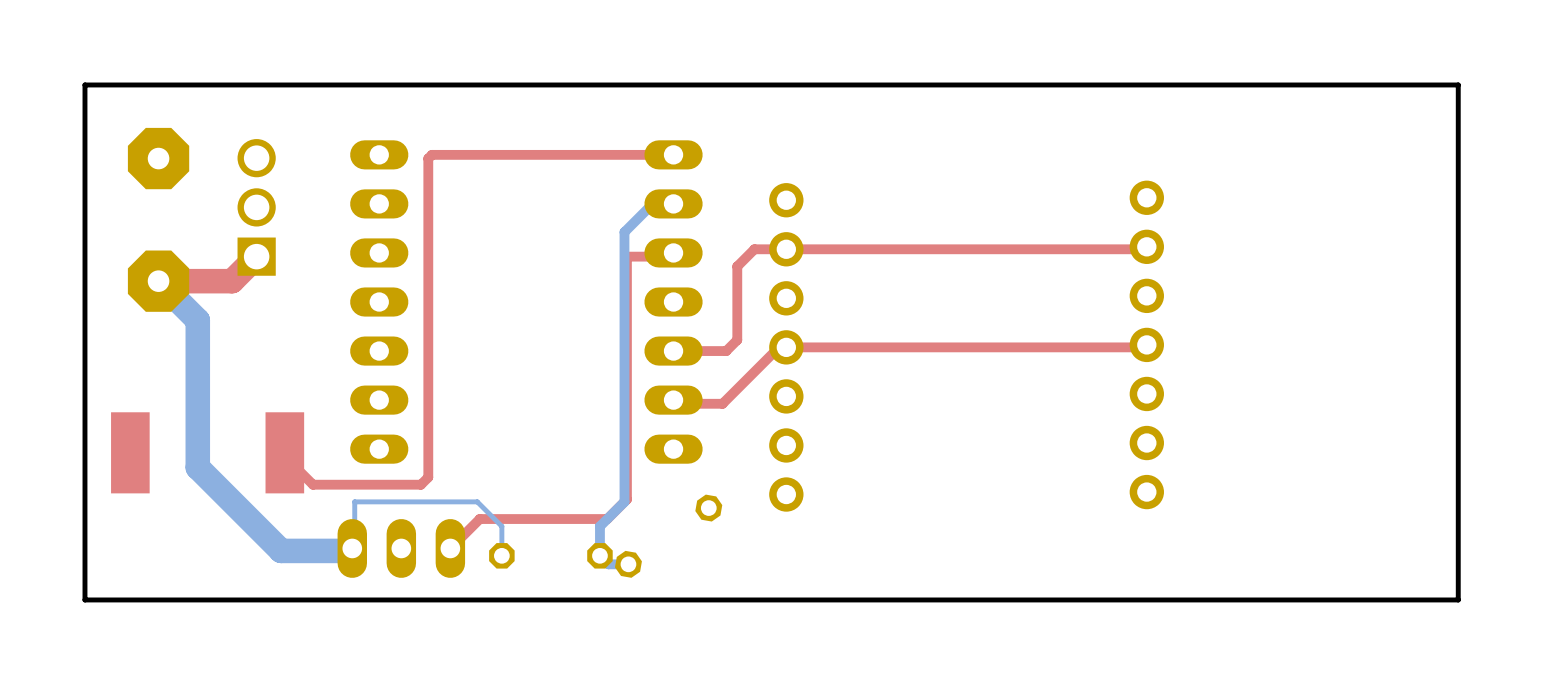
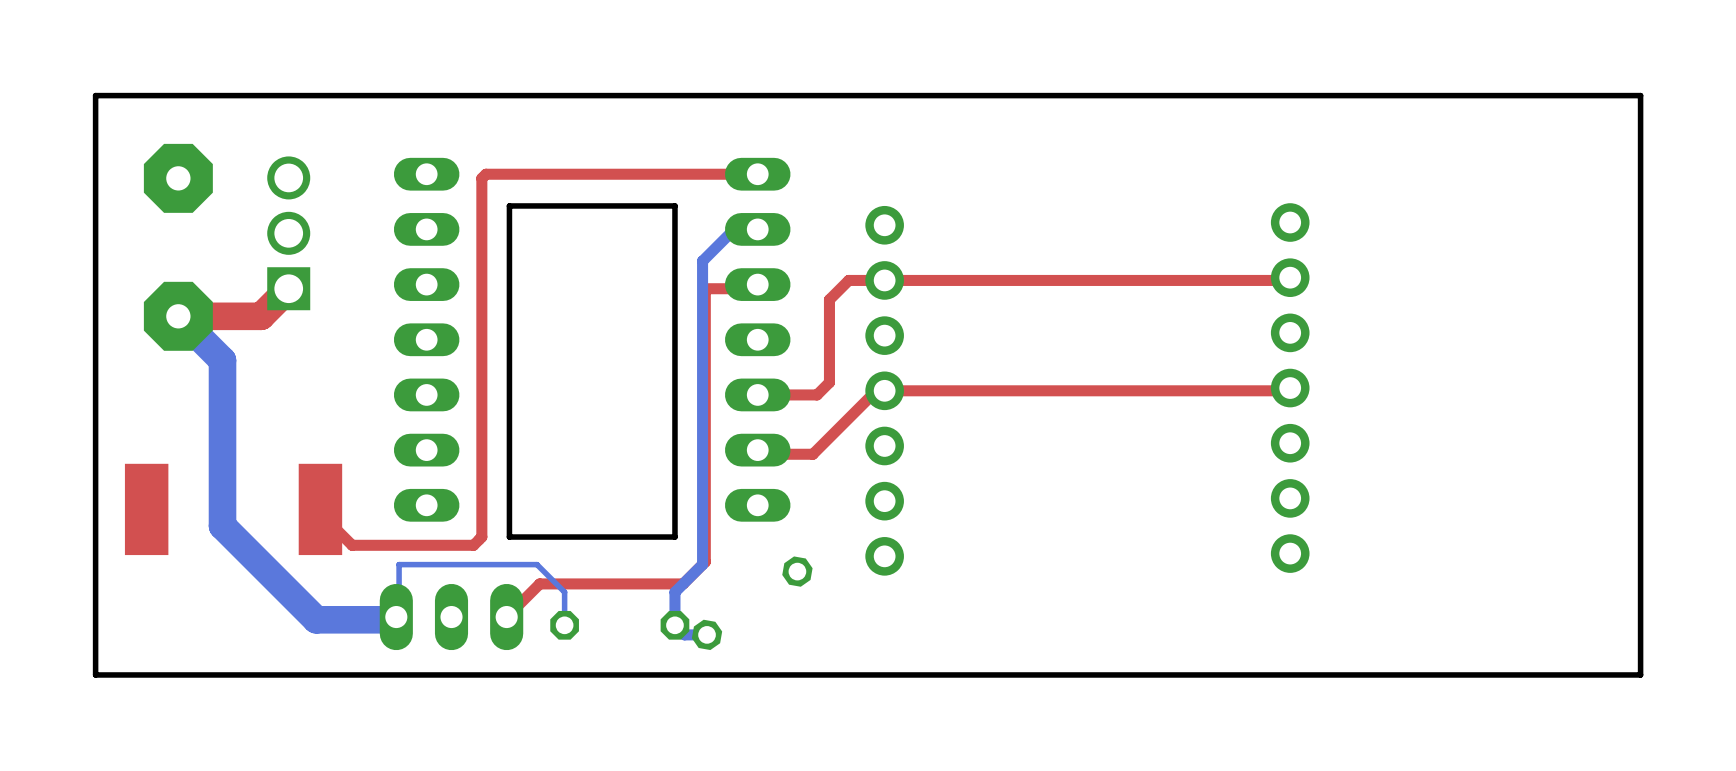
board edge: none -> (674, 205) (509, 205) (509, 537) (674, 537) (674, 205)

